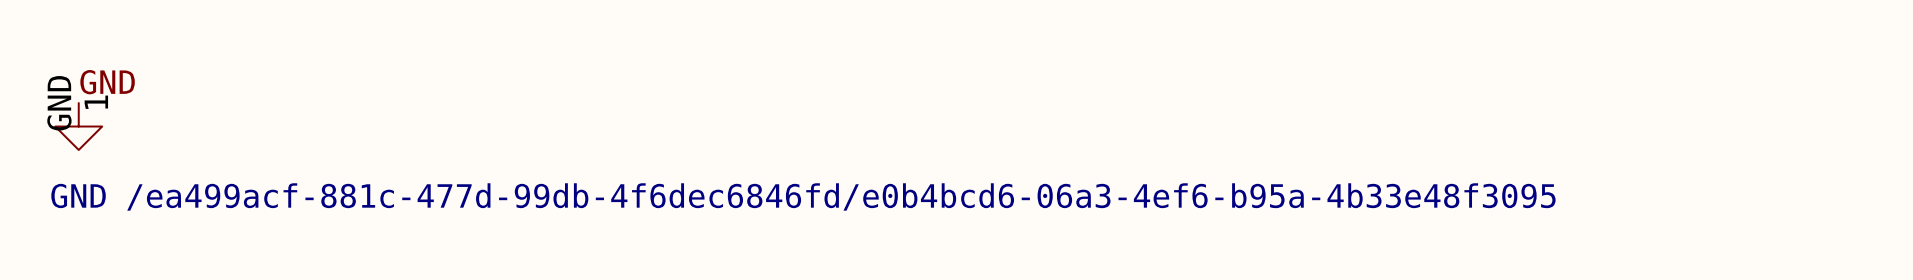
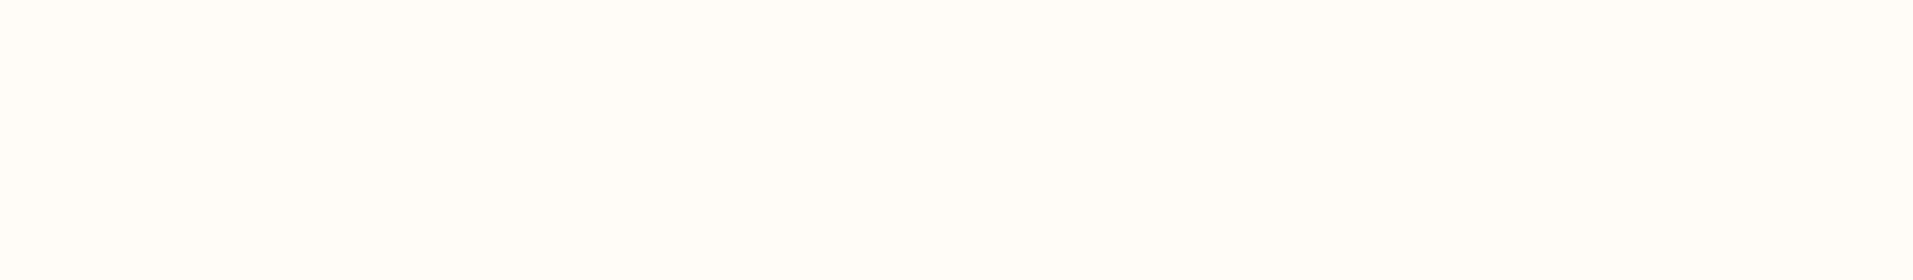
label: GND (107, 82) -> none
power symbol: GND (78, 126) -> none

